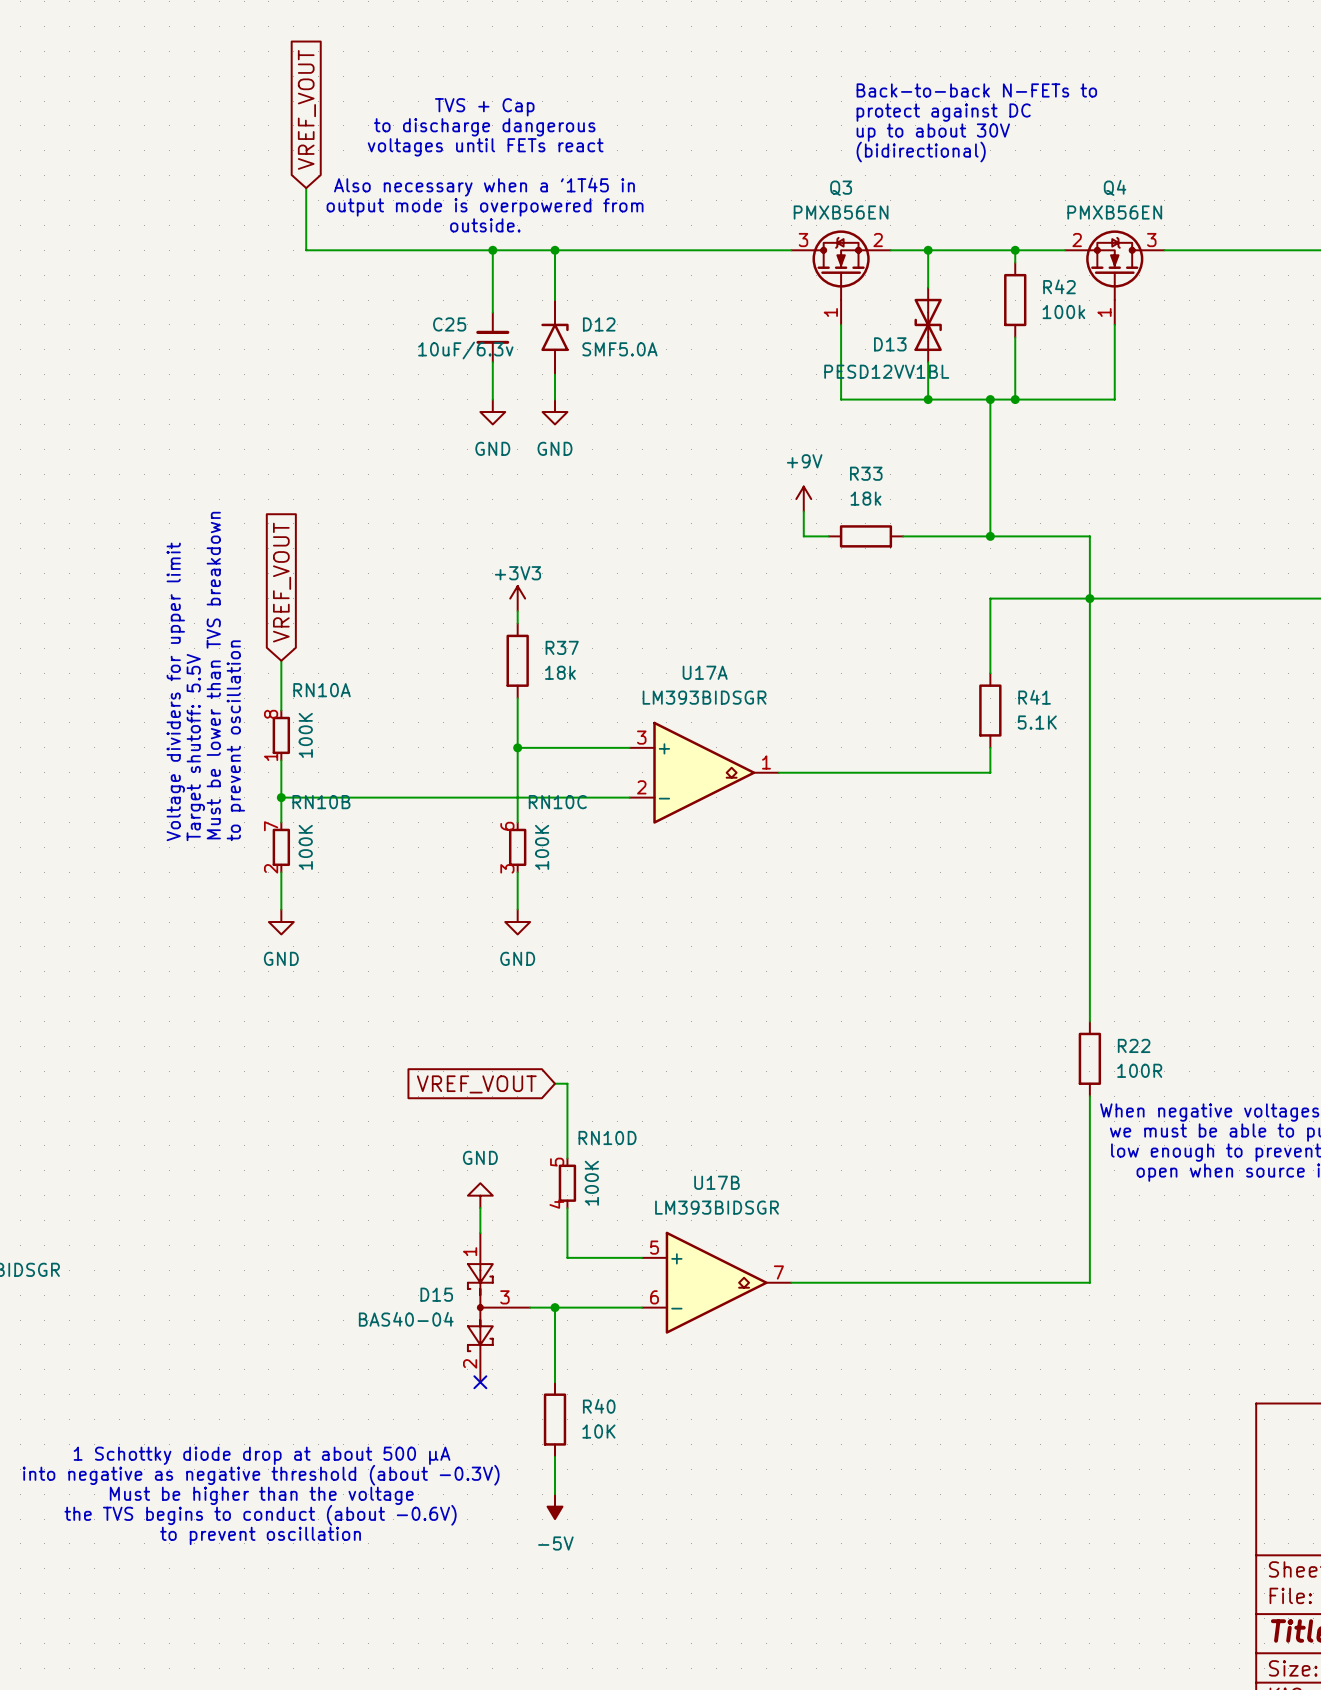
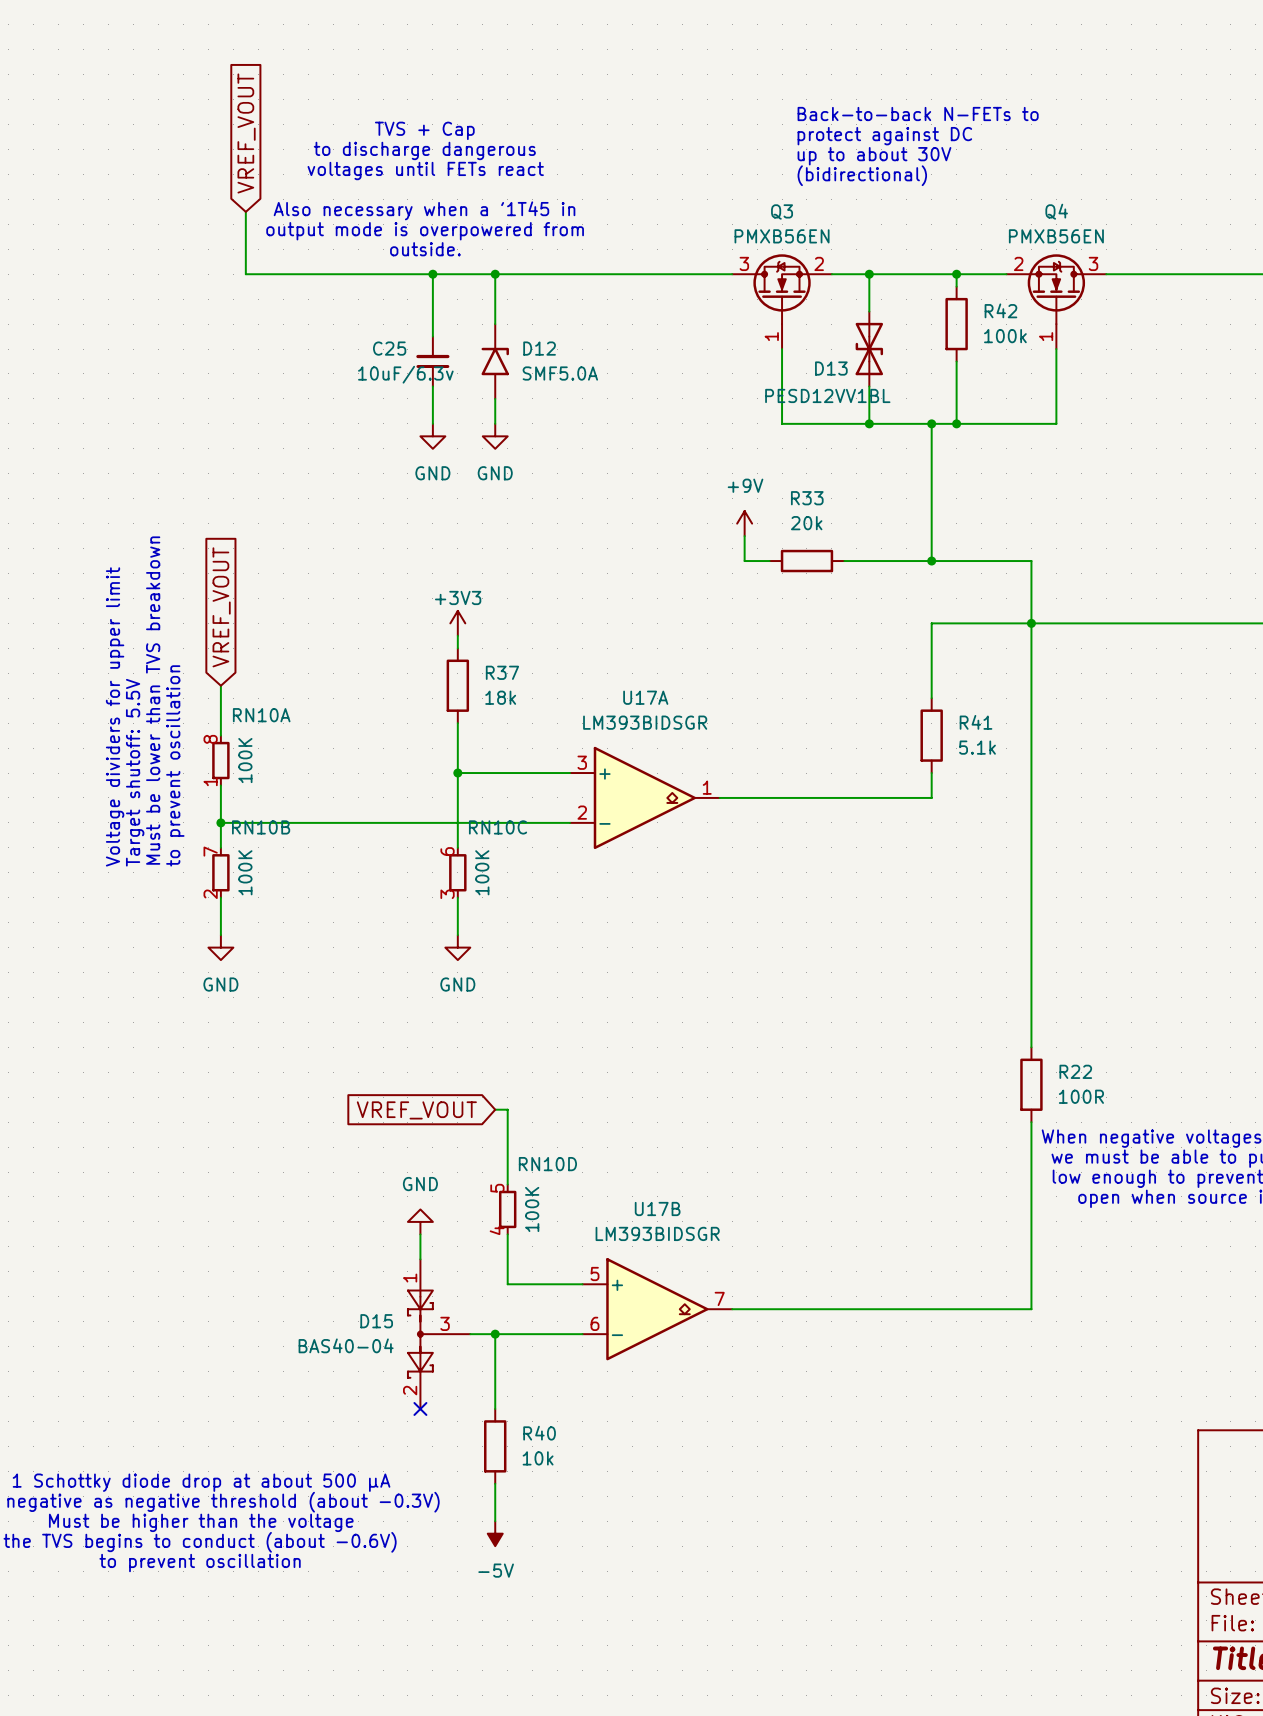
R33 value: 18k (865, 498) -> 20k (806, 523)
R41 value: 5.1K (1037, 722) -> 5.1k (977, 747)
R40 value: 10K (598, 1431) -> 10k (538, 1458)

